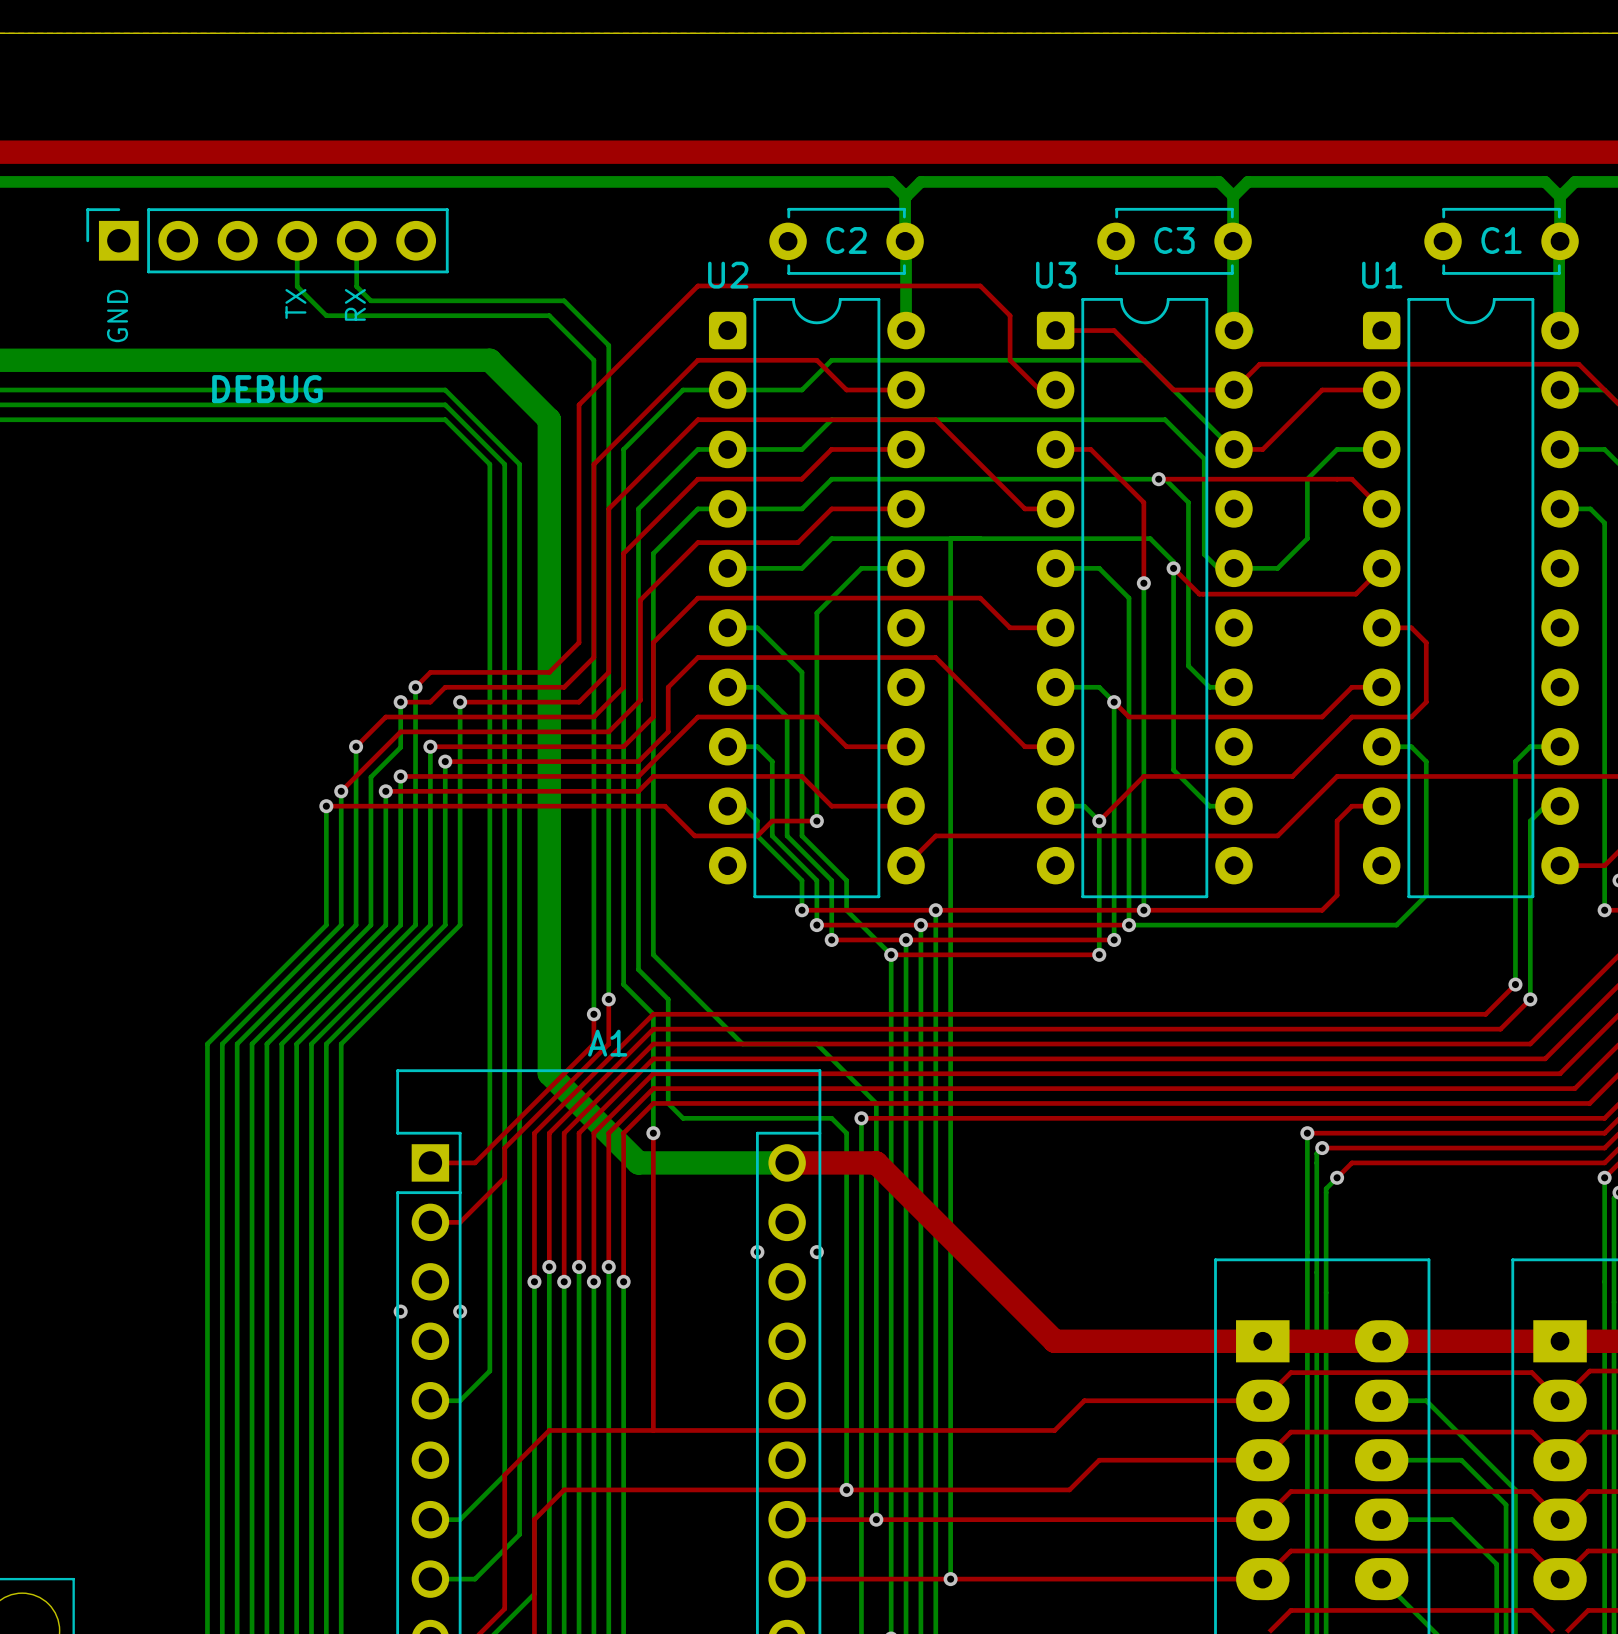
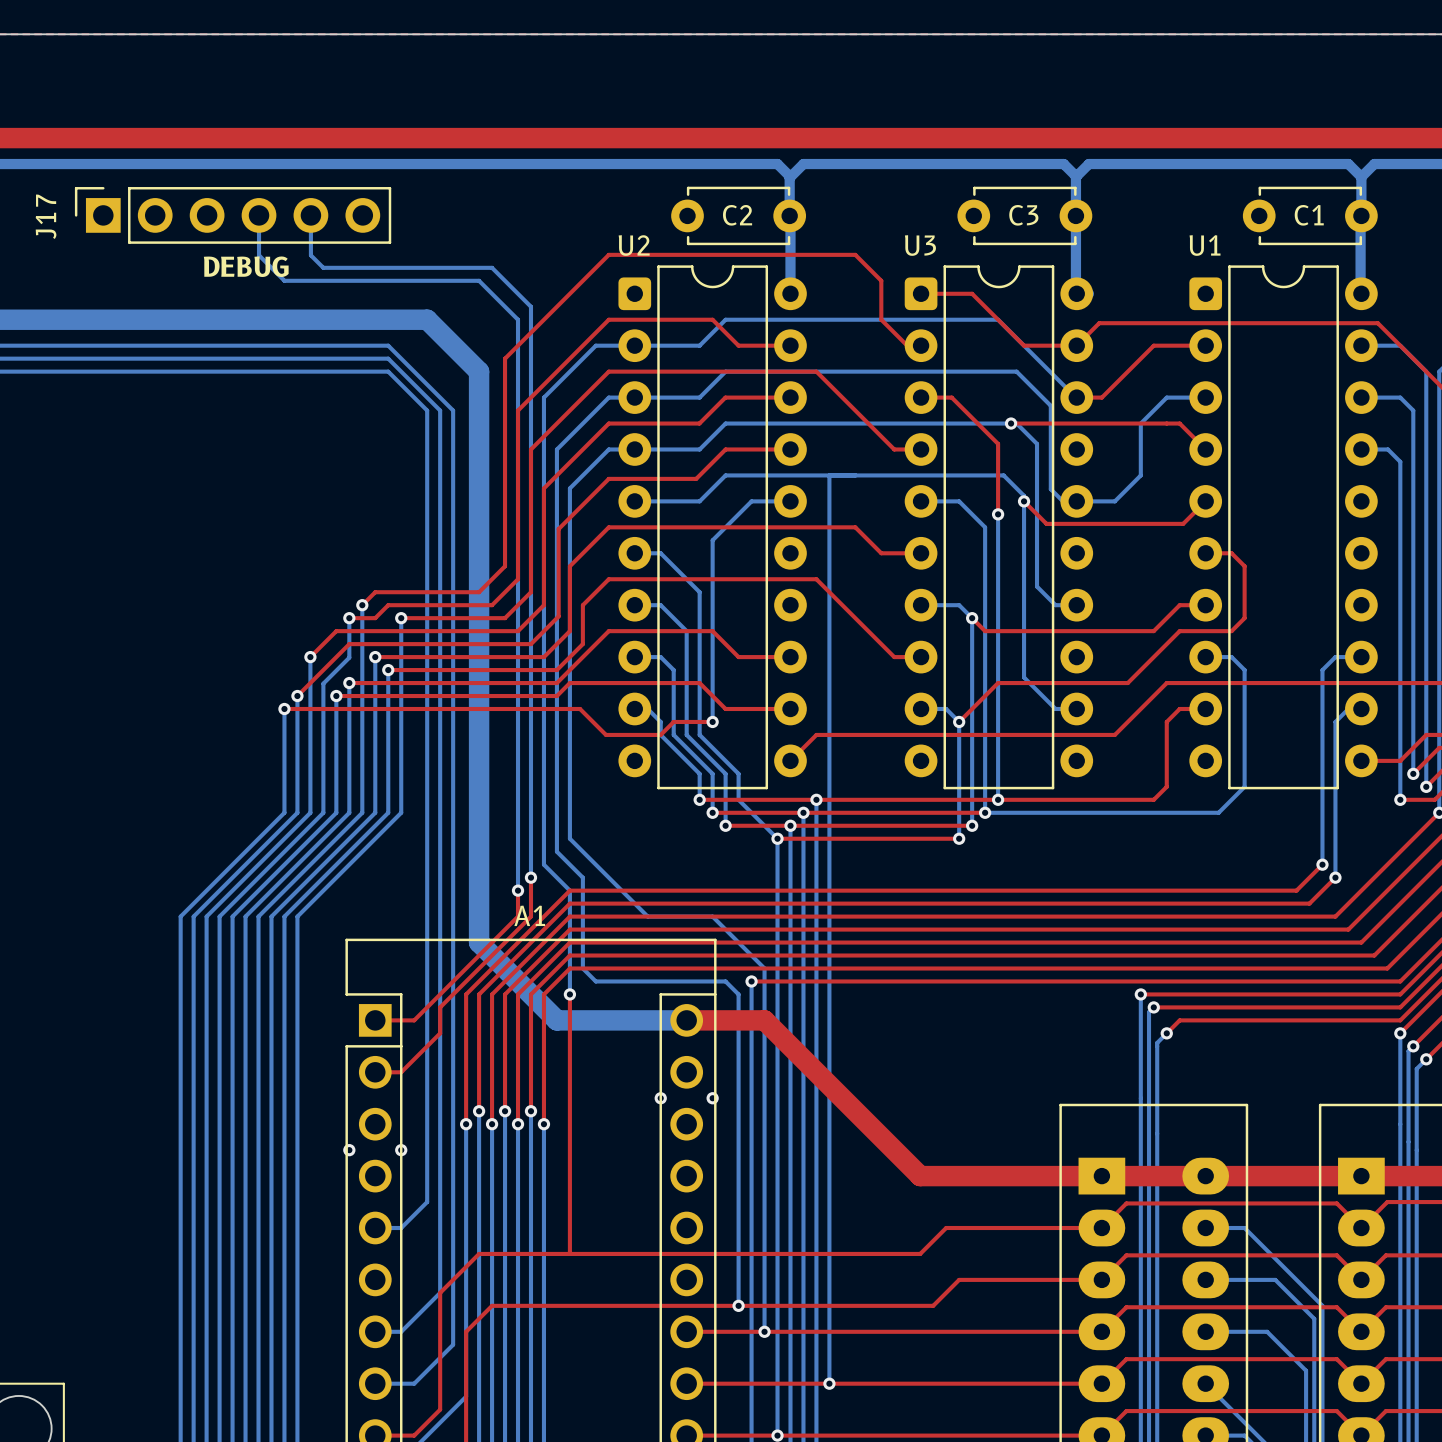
J17 name: none -> J17 (46, 216)
text: TX (295, 303) -> none
text: RX (355, 304) -> none
text: GND (117, 316) -> none
J17 value position: DEBUG (267, 389) -> DEBUG (246, 266)

